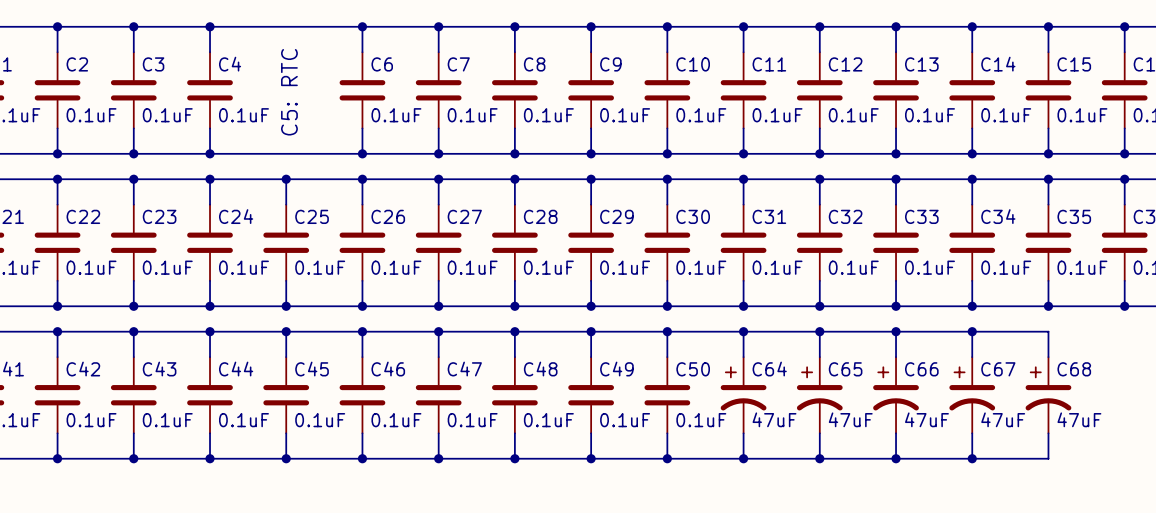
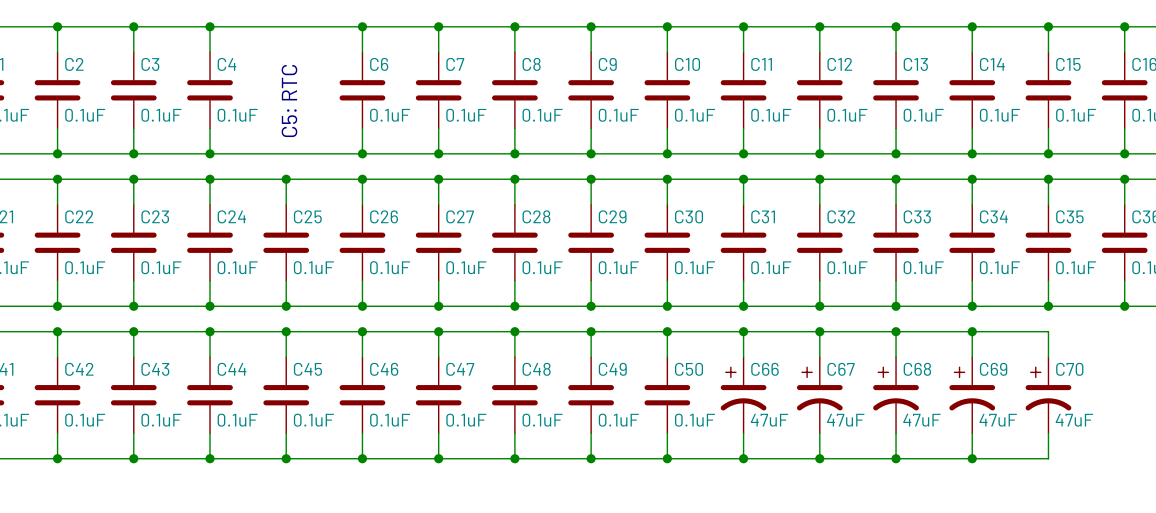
C64 name: C64 (769, 369) -> C66 (764, 369)
C65 name: C65 (845, 369) -> C67 (841, 369)
C66 name: C66 (921, 369) -> C68 (917, 369)
C67 name: C67 (998, 369) -> C69 (993, 369)
C68 name: C68 (1074, 369) -> C70 (1069, 369)

